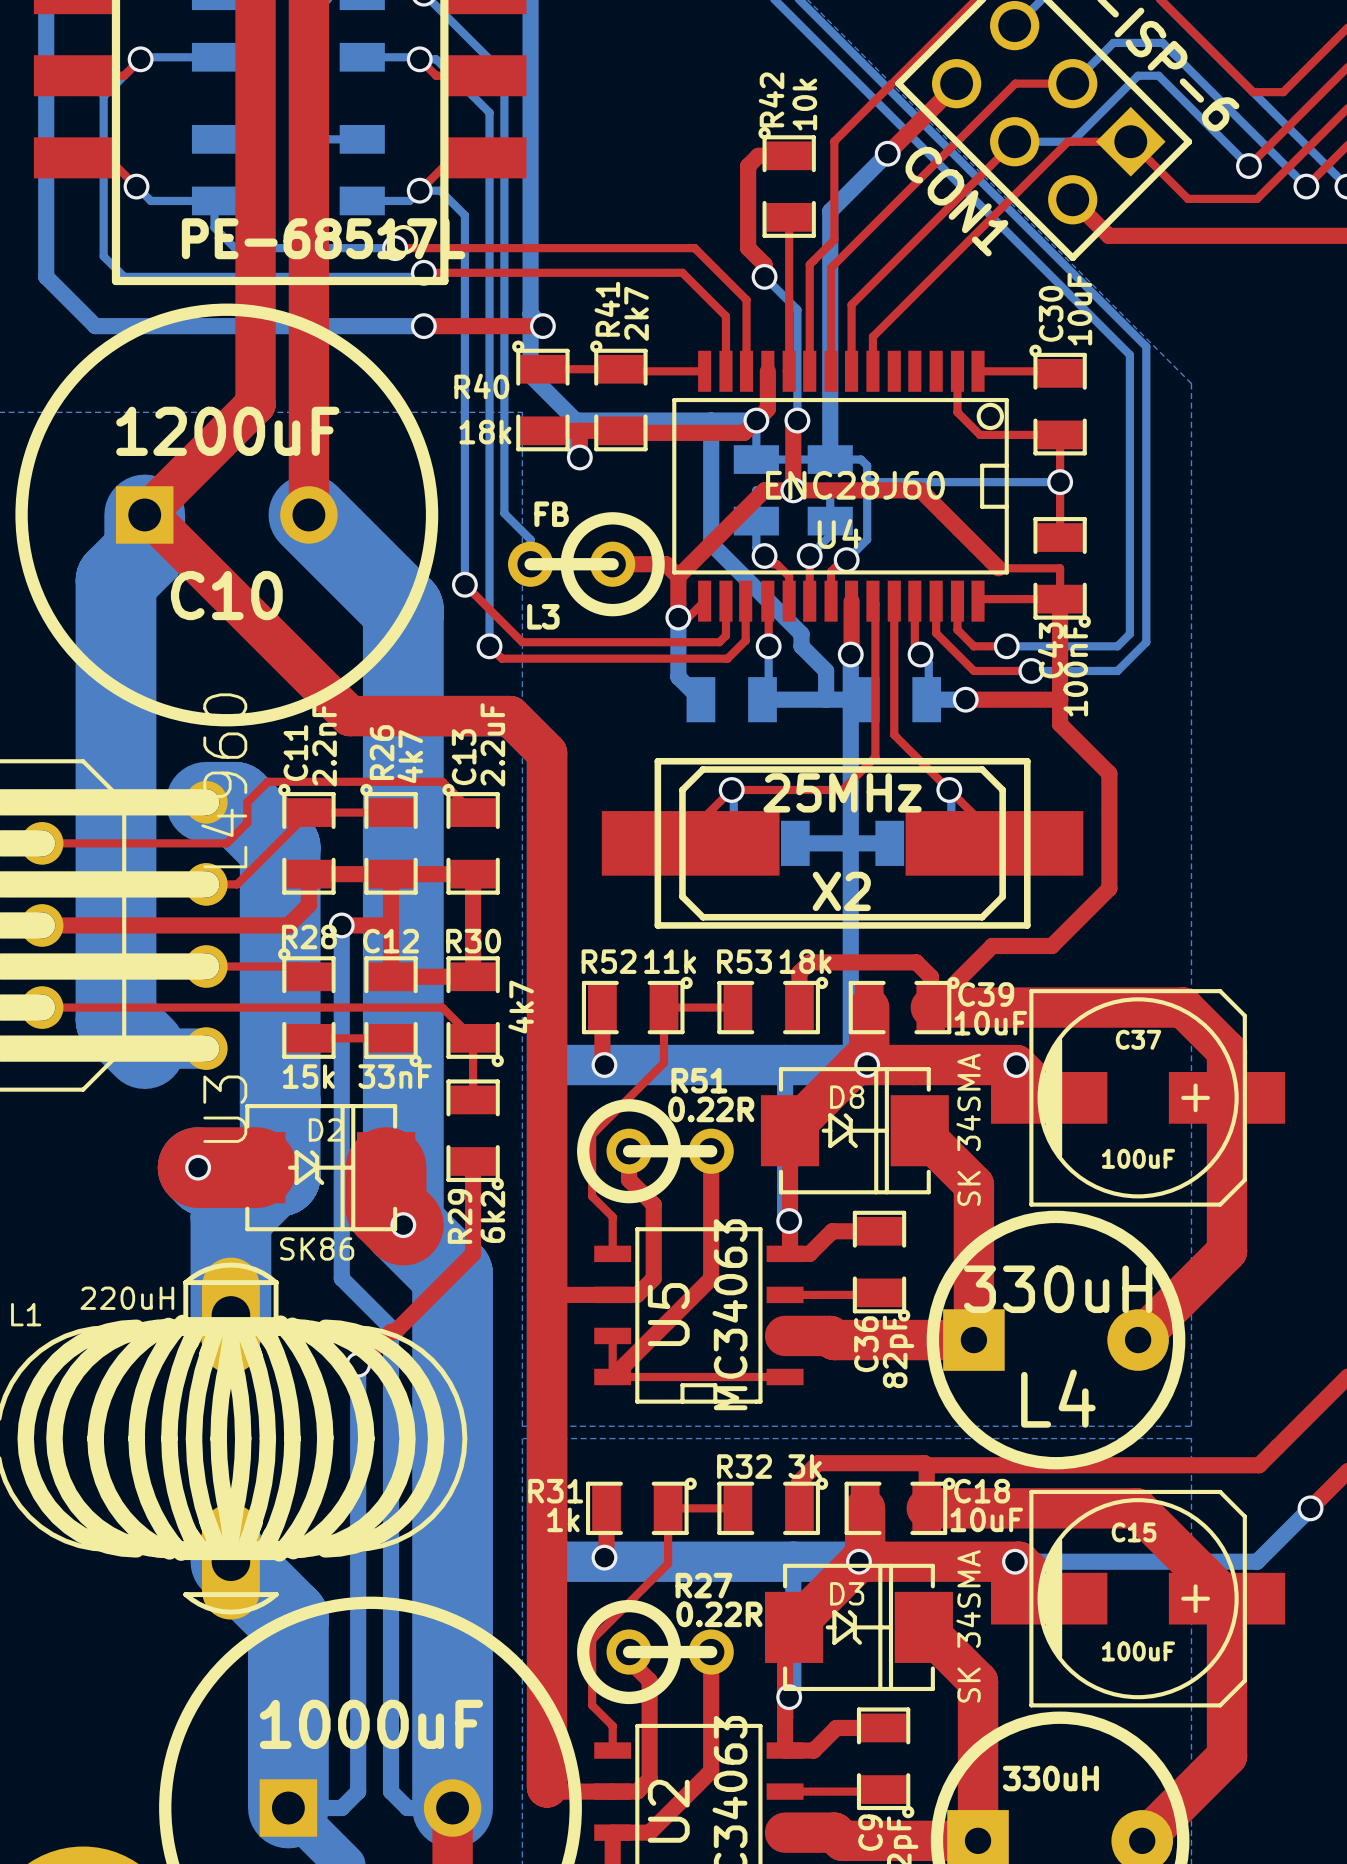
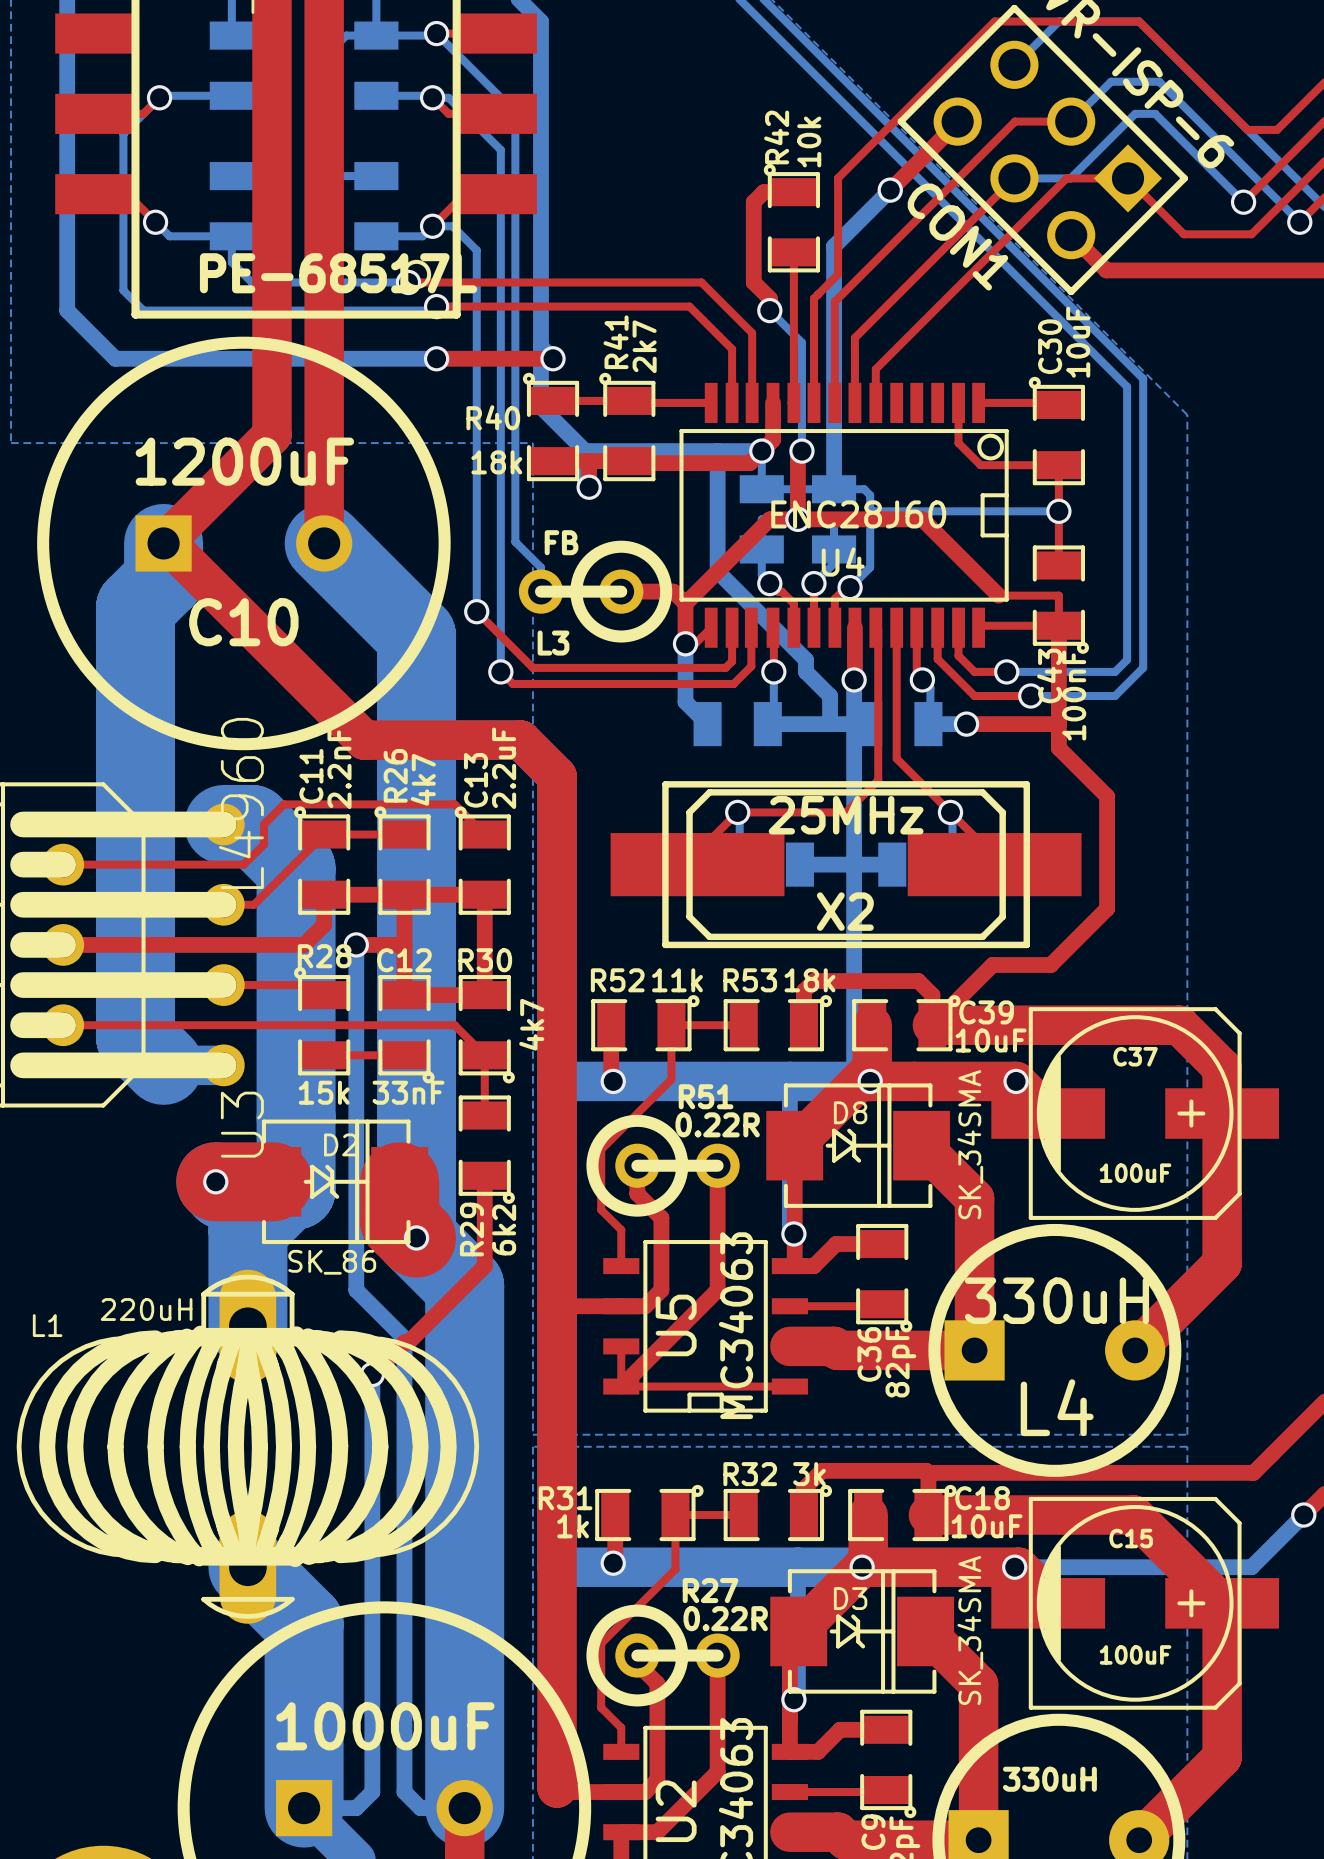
D8 value: SK 34SMA (968, 1129) -> SK_34SMA (970, 1144)
D2 value: SK86 (317, 1248) -> SK_86 (332, 1262)
D3 value: SK 34SMA (968, 1626) -> SK_34SMA (970, 1630)

